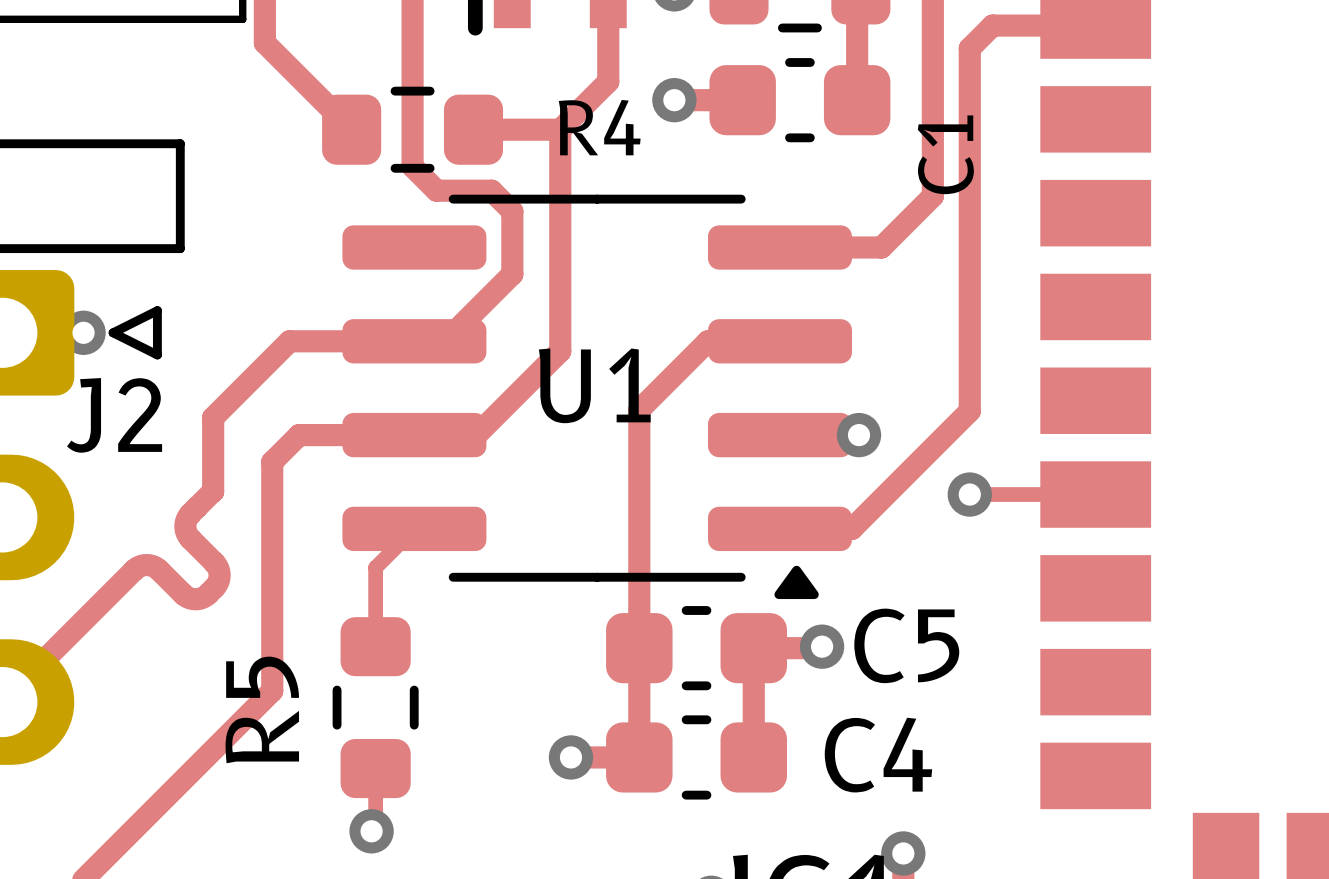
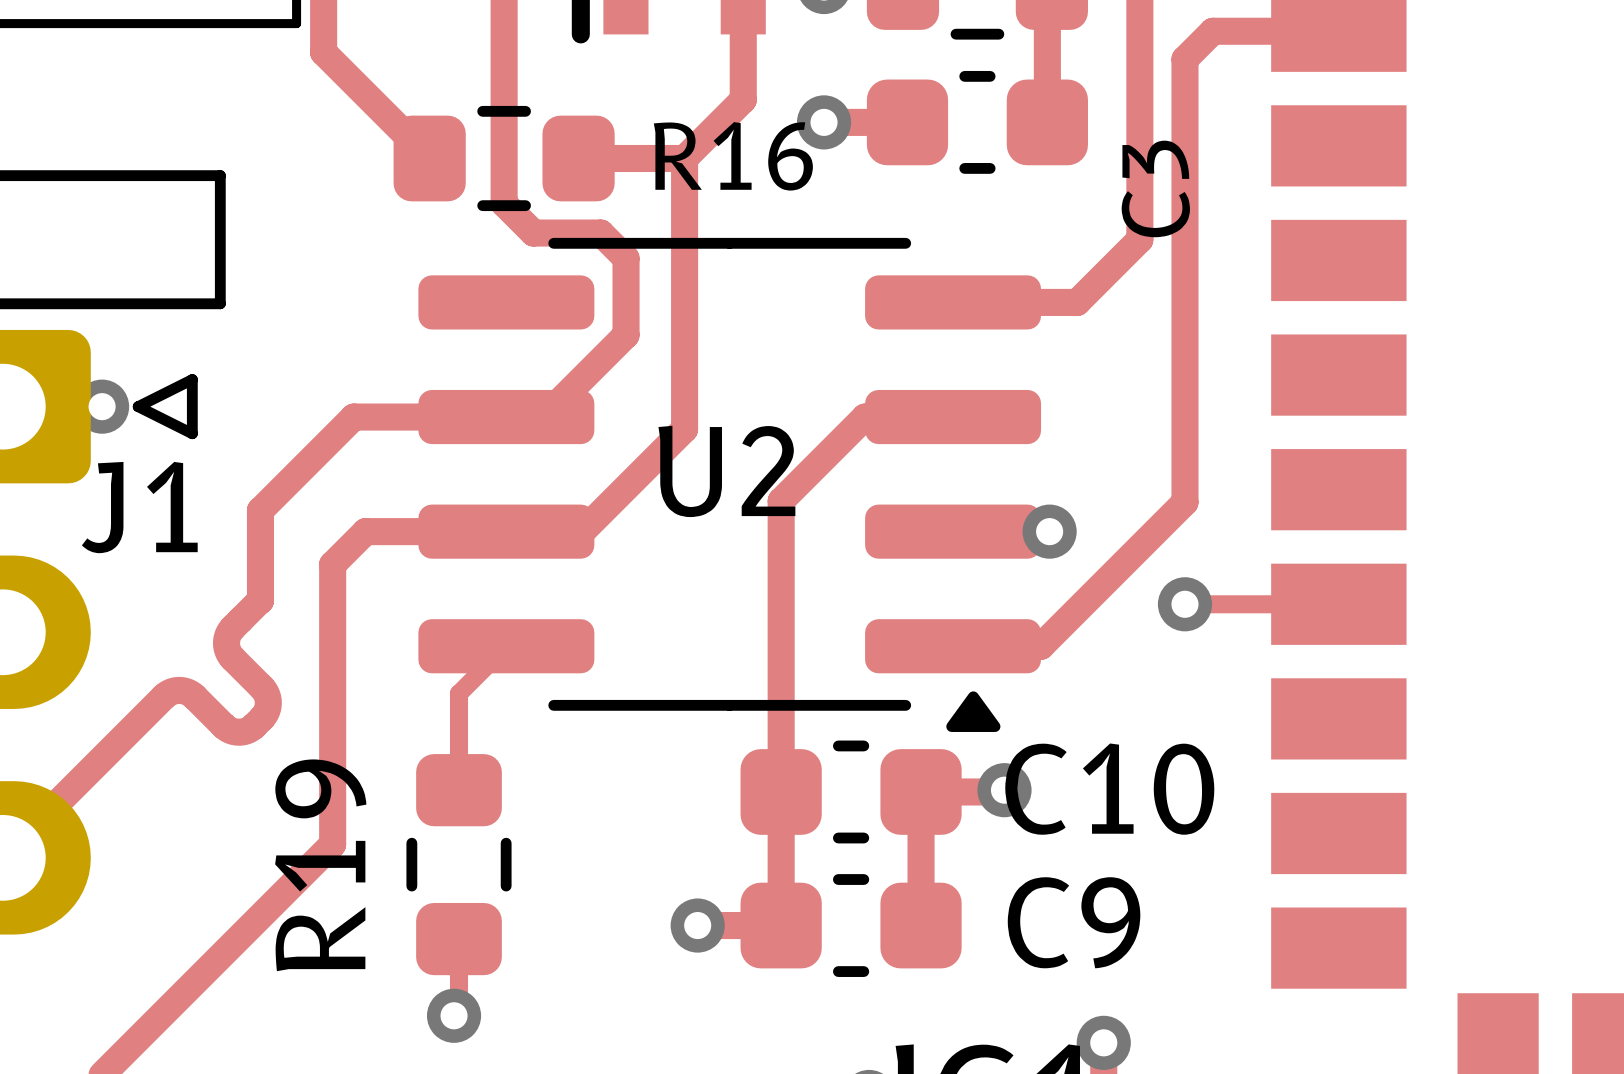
R4 name: R4 (599, 127) -> R16 (733, 156)
C1 name: C1 (945, 154) -> C3 (1155, 188)
U1 name: U1 (594, 385) -> U2 (726, 471)
J2 name: J2 (114, 415) -> J1 (139, 507)
C5 name: C5 (906, 645) -> C10 (1109, 789)
R5 name: R5 (262, 709) -> R19 (320, 865)
C4 name: C4 (878, 755) -> C9 (1074, 922)

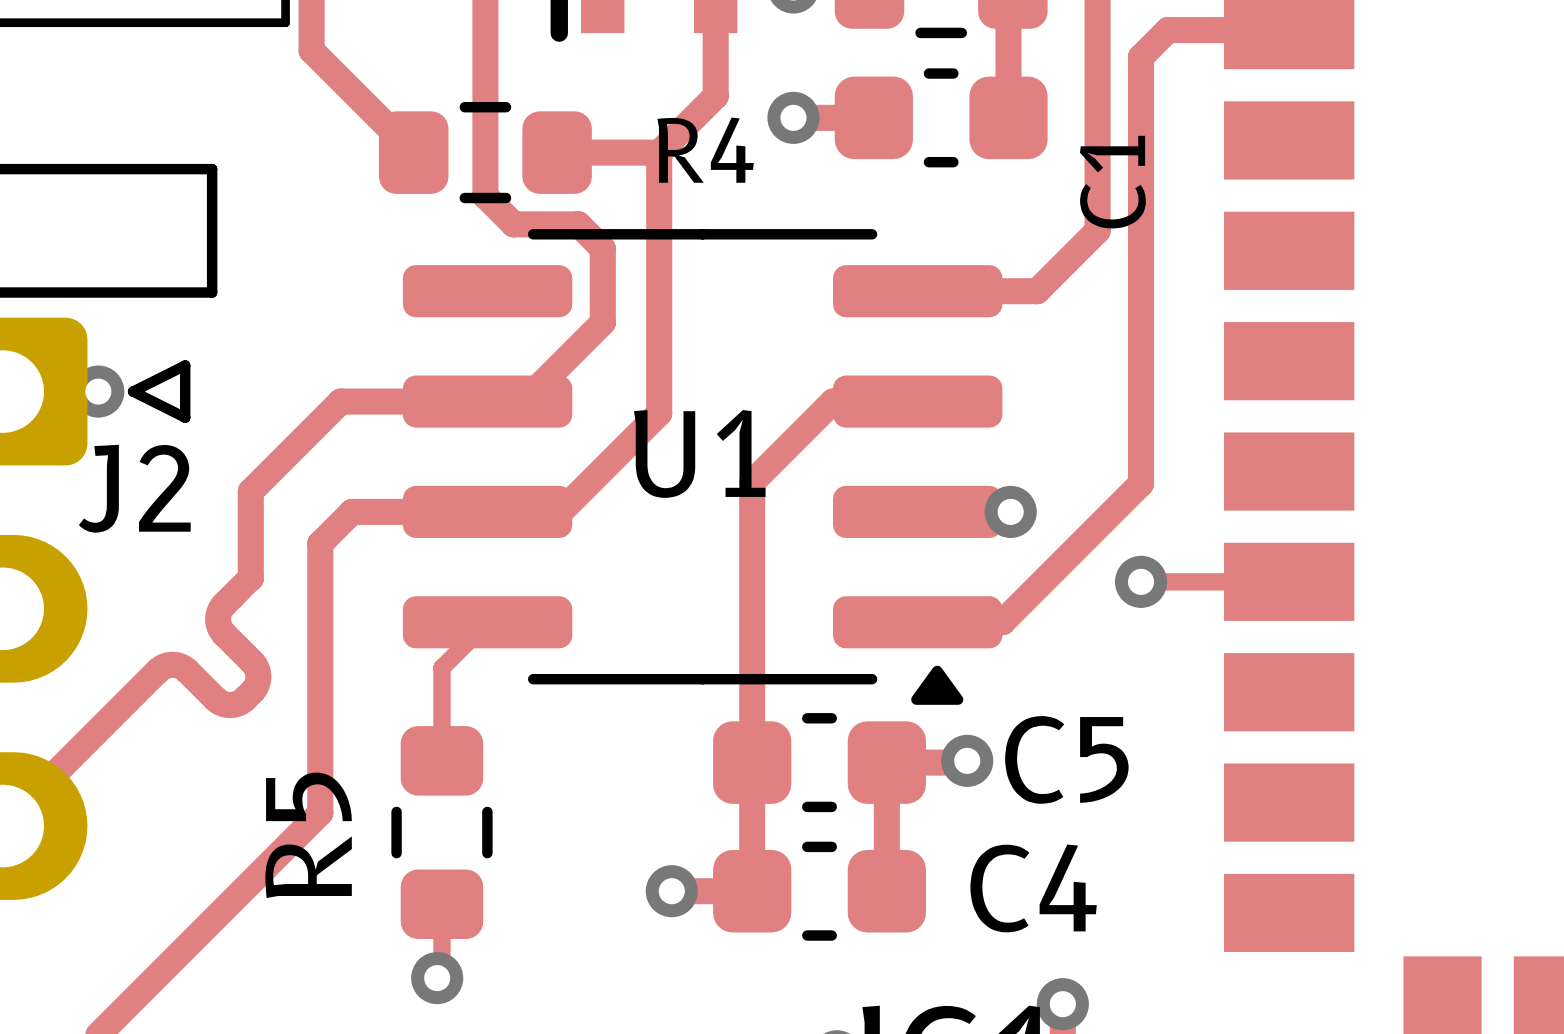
R16 name: R16 (733, 156) -> R4 (705, 150)
C3 name: C3 (1155, 188) -> C1 (1112, 182)
U2 name: U2 (726, 471) -> U1 (699, 453)
J1 name: J1 (139, 507) -> J2 (134, 488)
C10 name: C10 (1109, 789) -> C5 (1066, 759)
R19 name: R19 (320, 865) -> R5 (308, 835)
C9 name: C9 (1074, 922) -> C4 (1033, 888)

